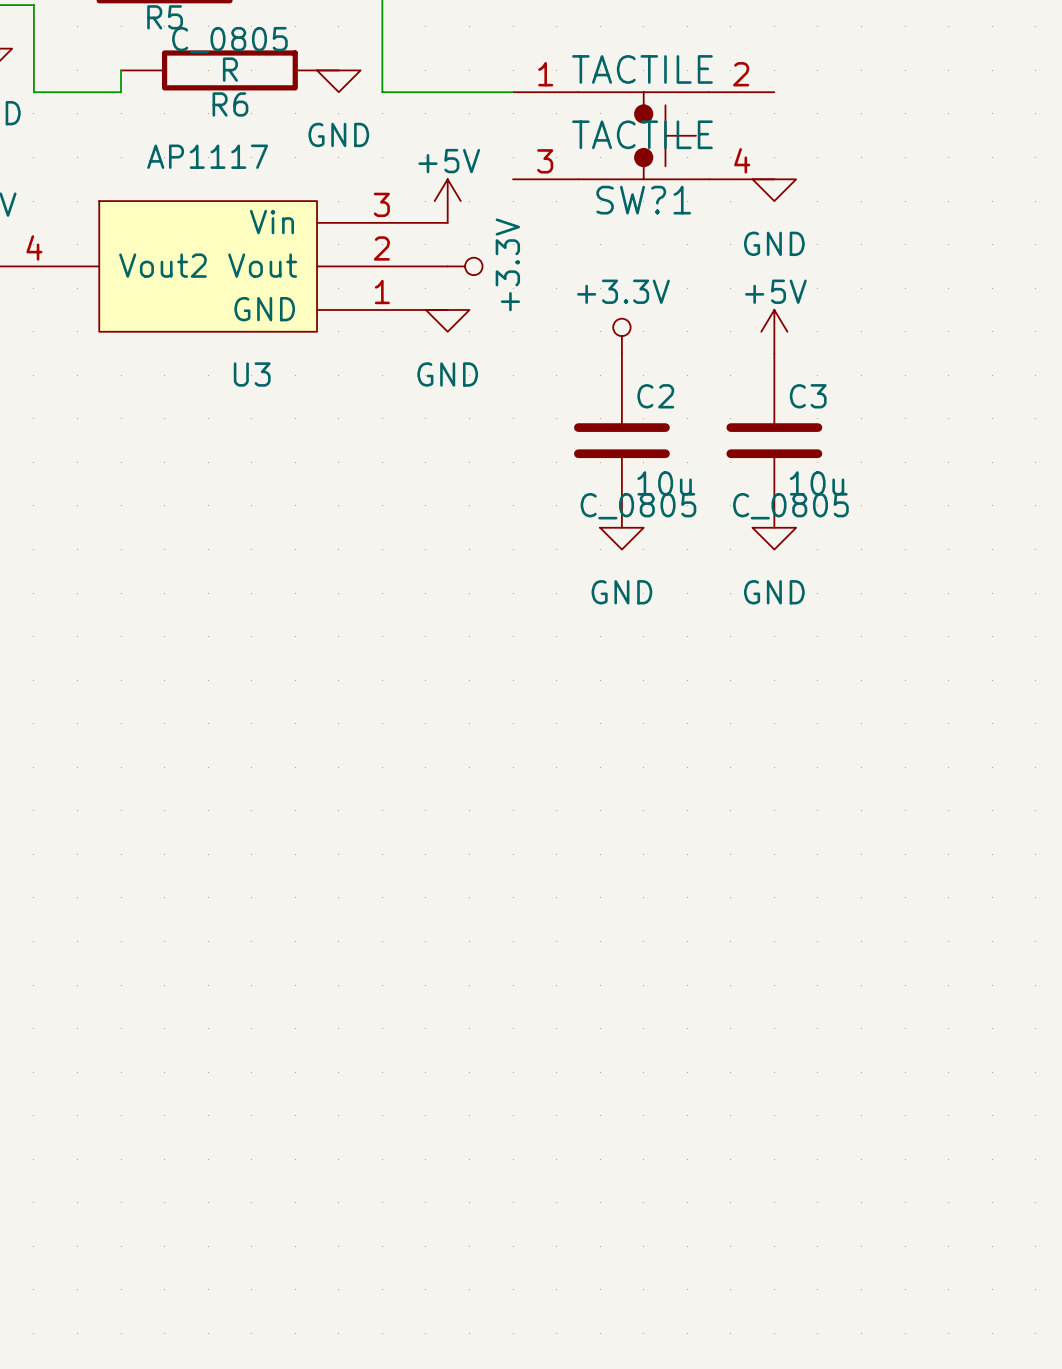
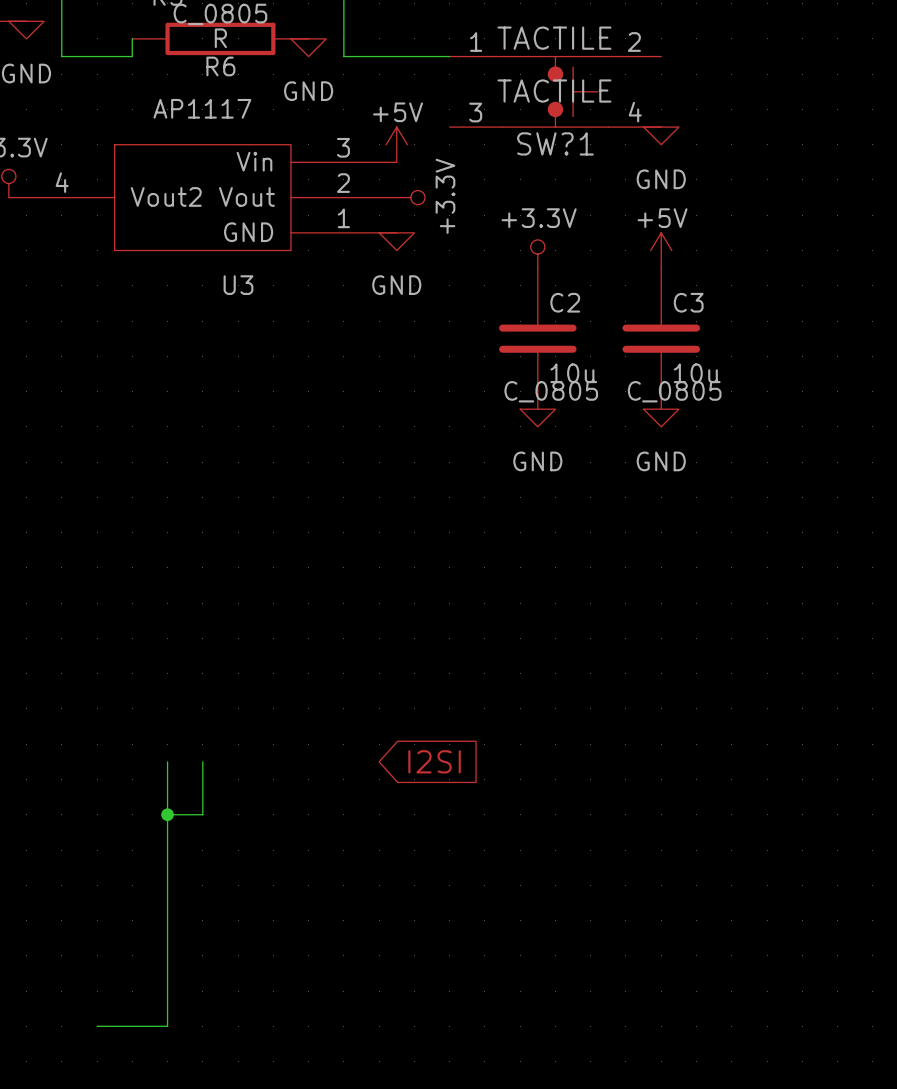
wire: none -> (167, 761) (167, 1026) (97, 1026)
wire: none -> (202, 761) (202, 814) (167, 814)
global label: none -> I2SI (434, 761)
junction: none -> (167, 814)

